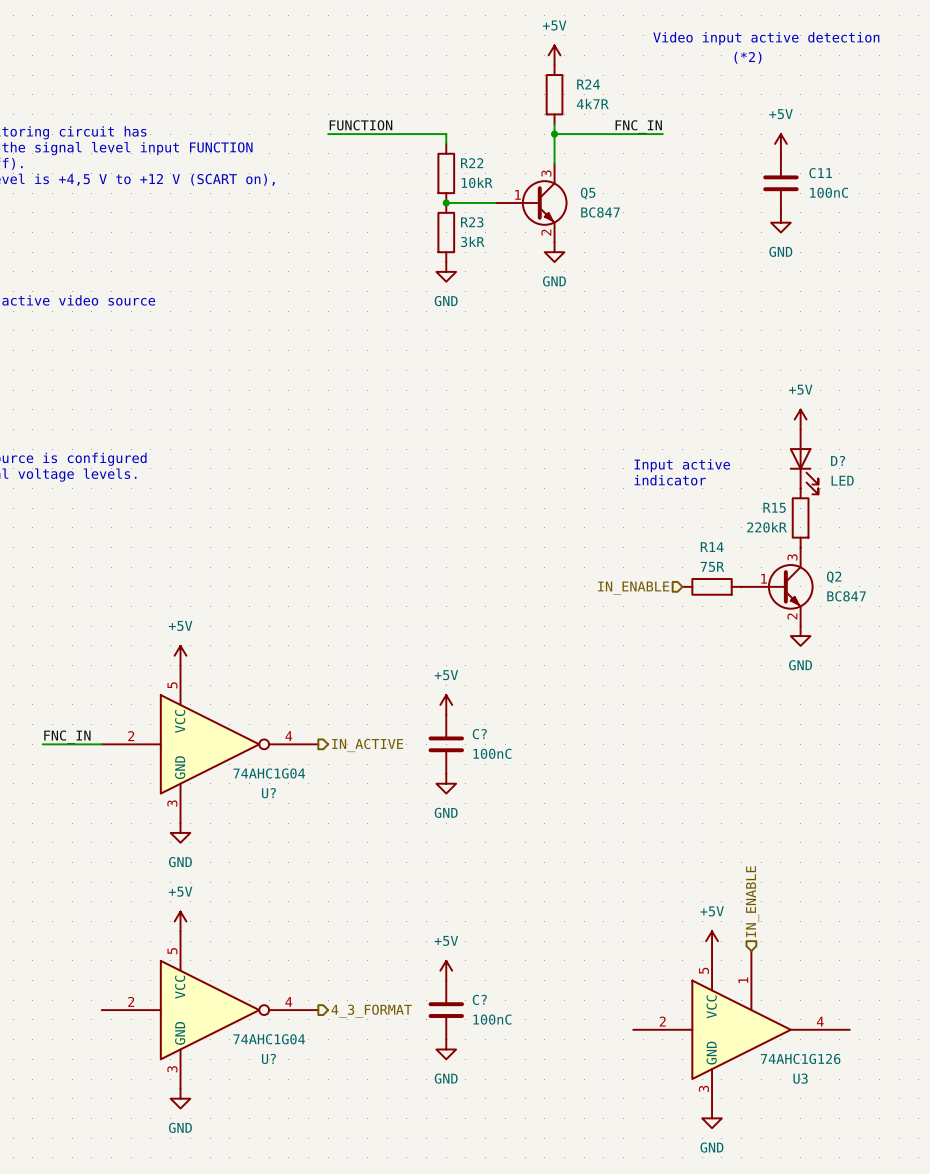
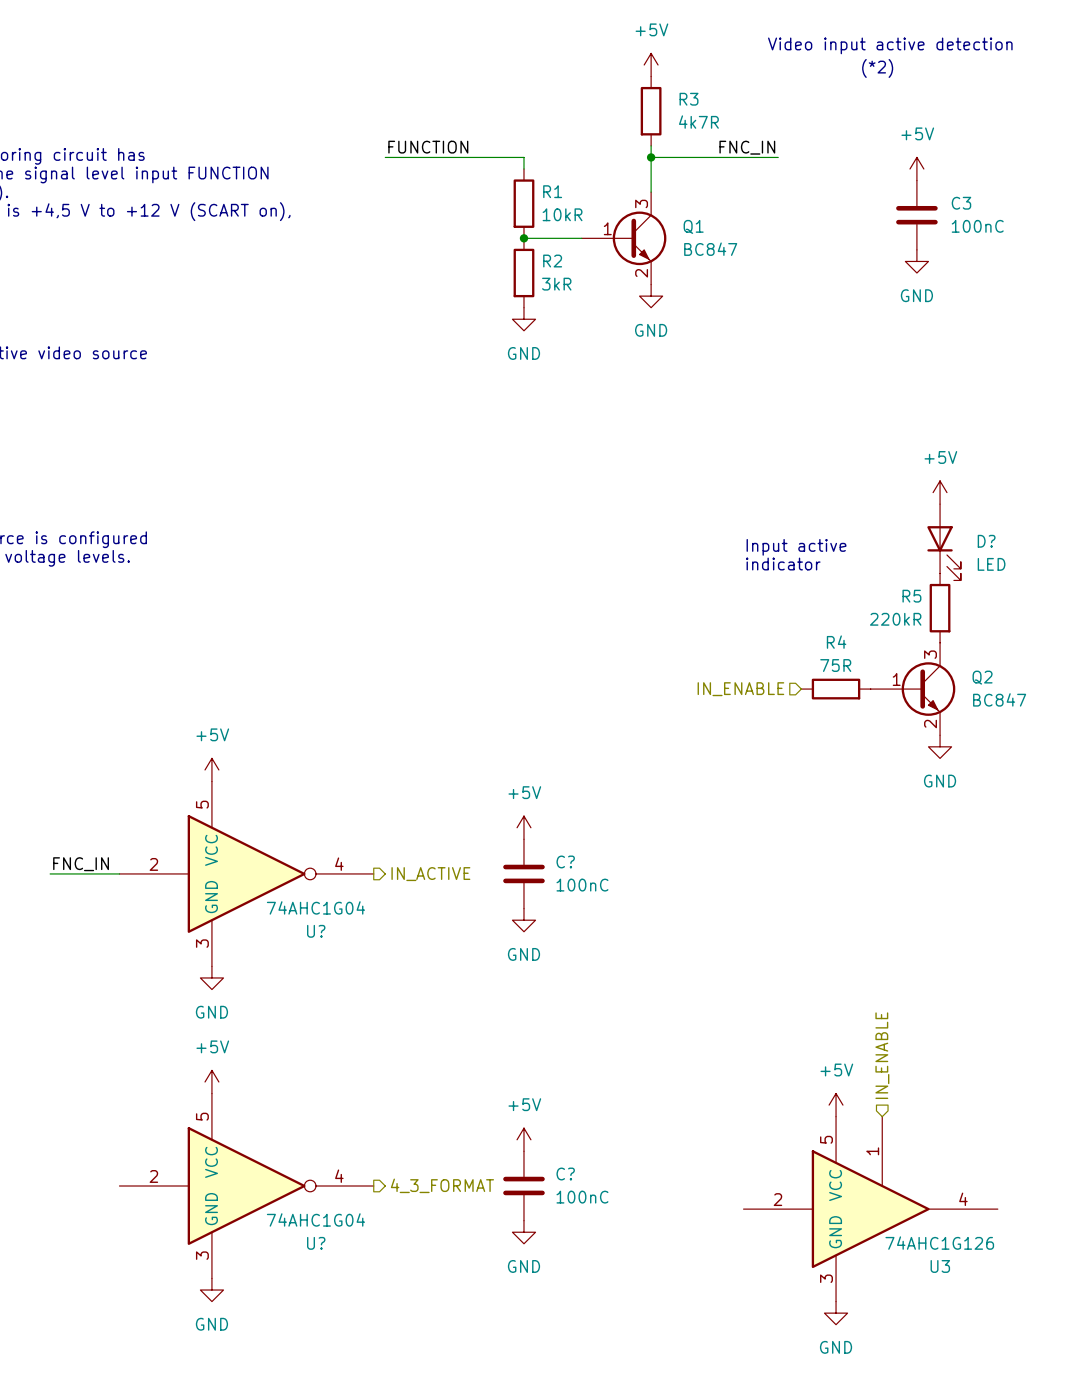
R24 name: R24 (588, 84) -> R3 (689, 99)
R22 name: R22 (472, 163) -> R1 (552, 191)
C11 name: C11 (820, 173) -> C3 (961, 203)
Q5 name: Q5 (588, 193) -> Q1 (693, 226)
R23 name: R23 (472, 222) -> R2 (552, 261)
R15 name: R15 (774, 507) -> R5 (911, 596)
R14 name: R14 (712, 547) -> R4 (836, 642)

